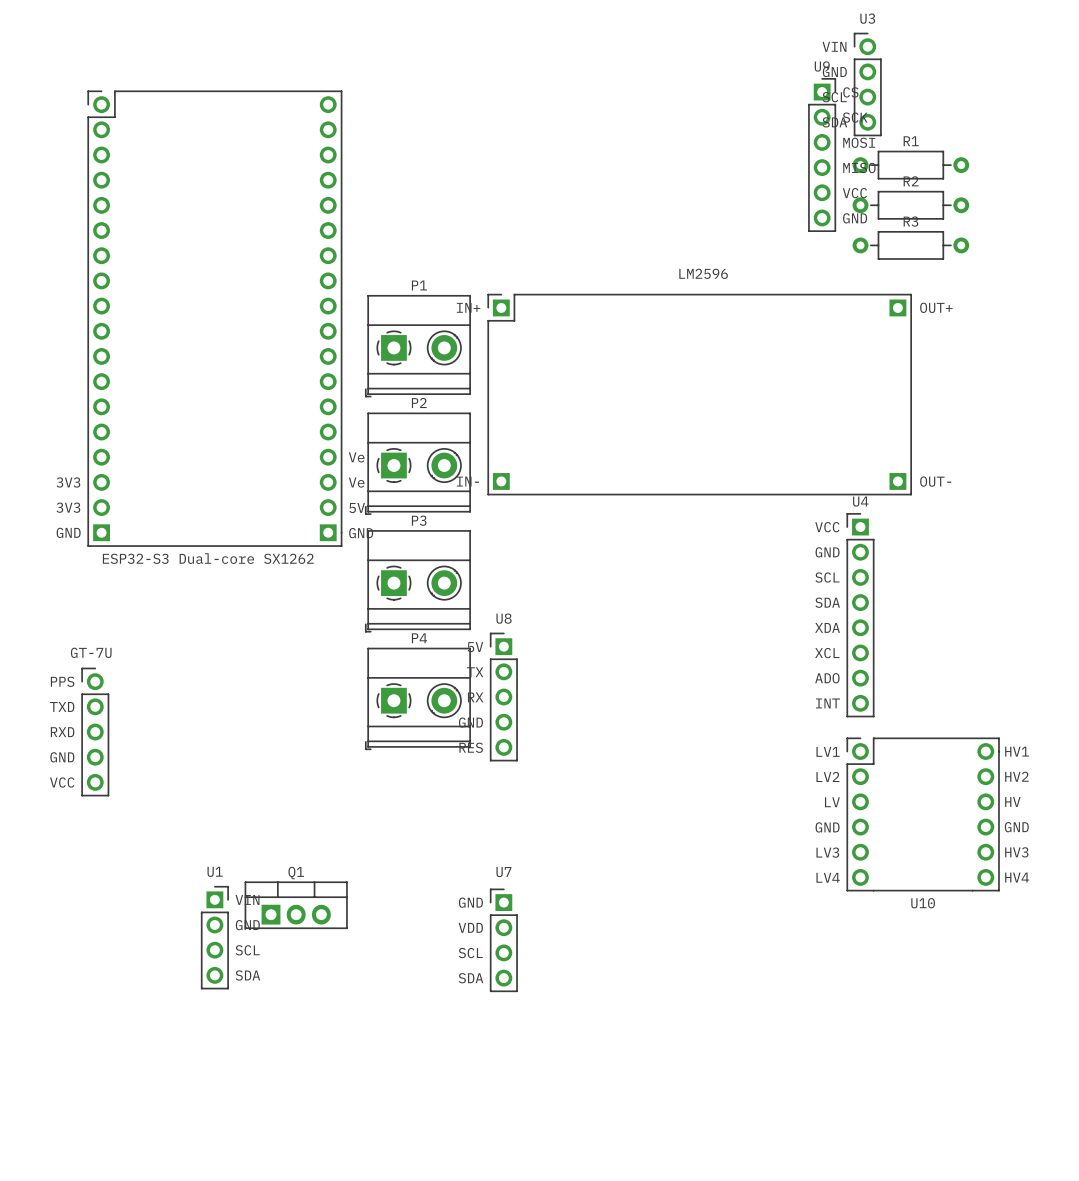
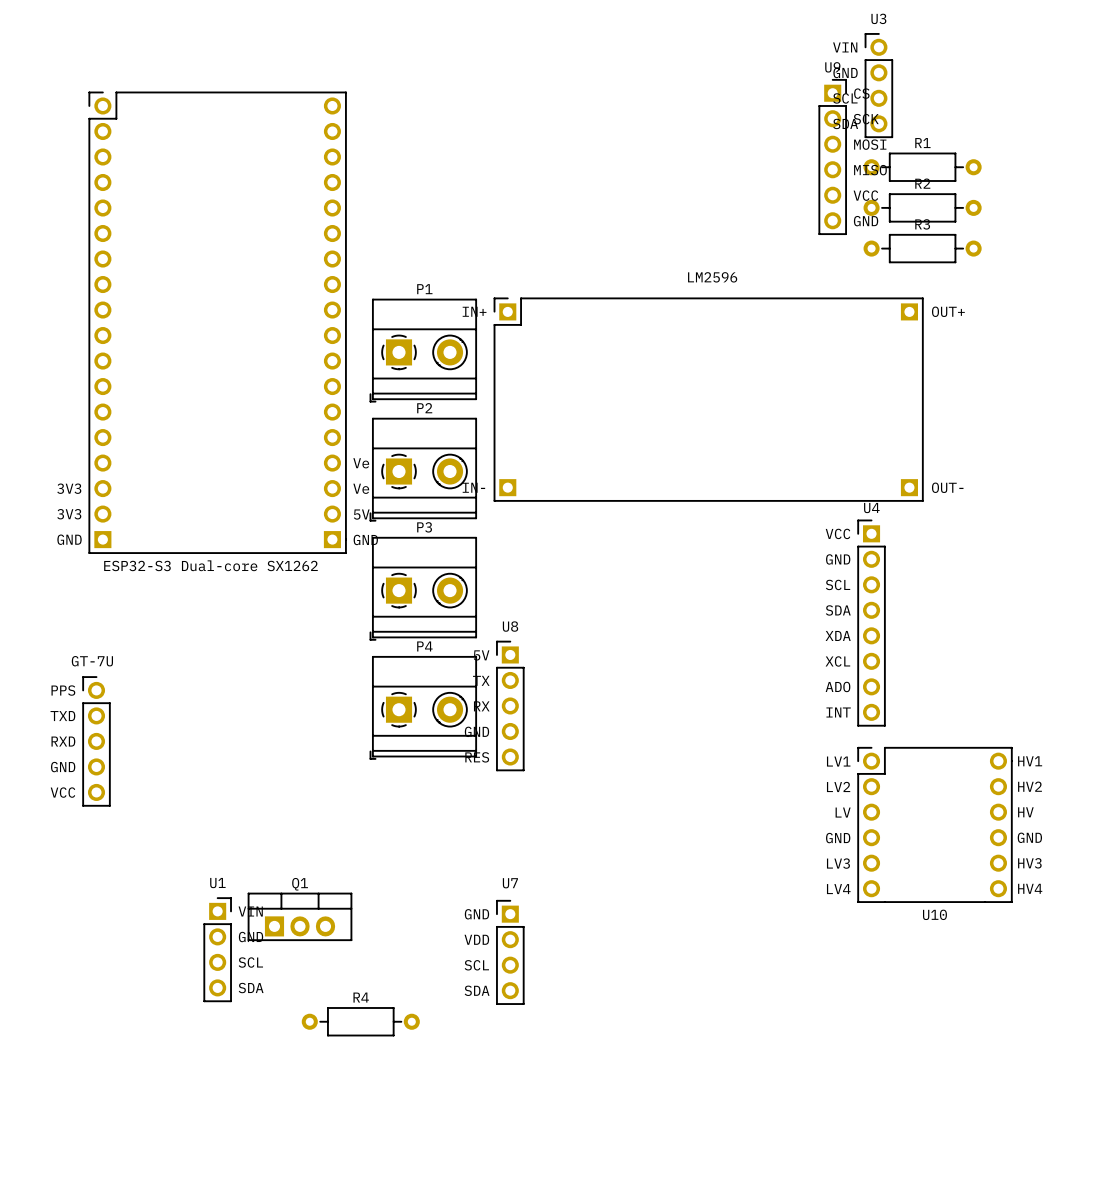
R4: none -> (360, 1021)

